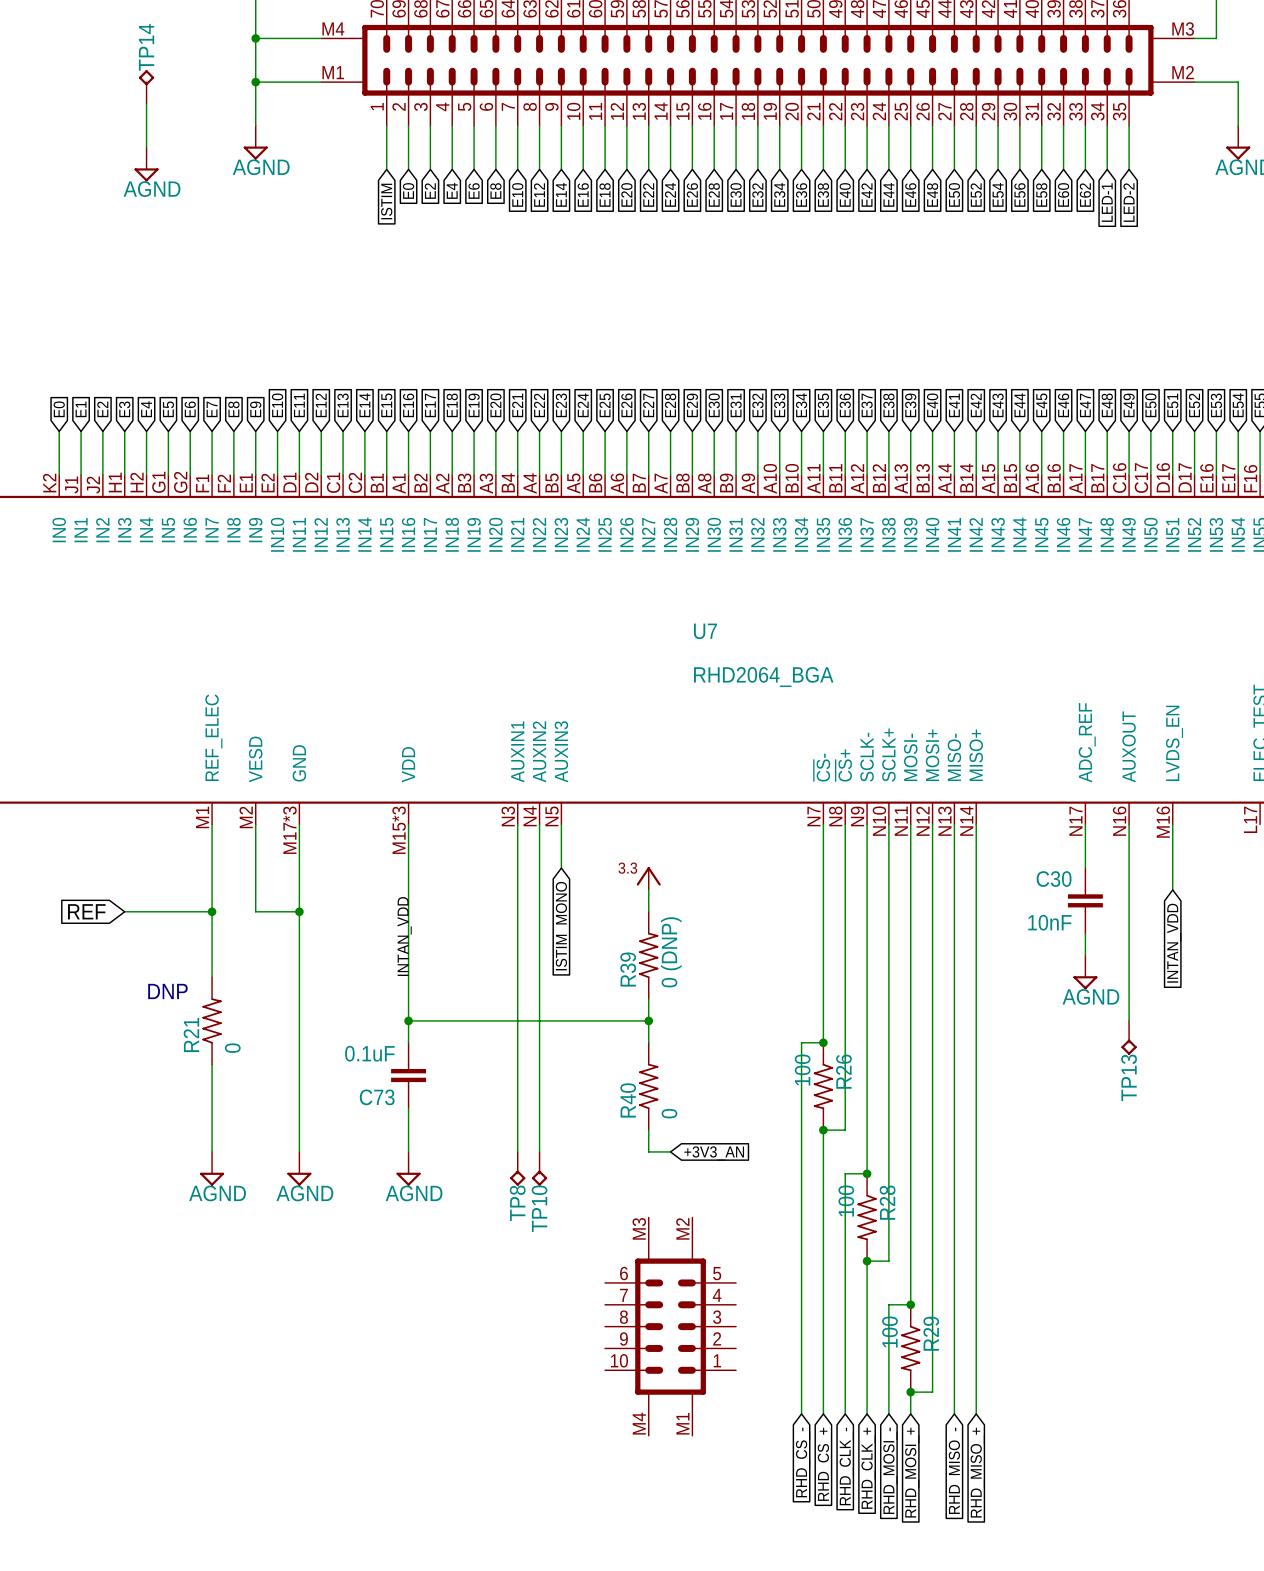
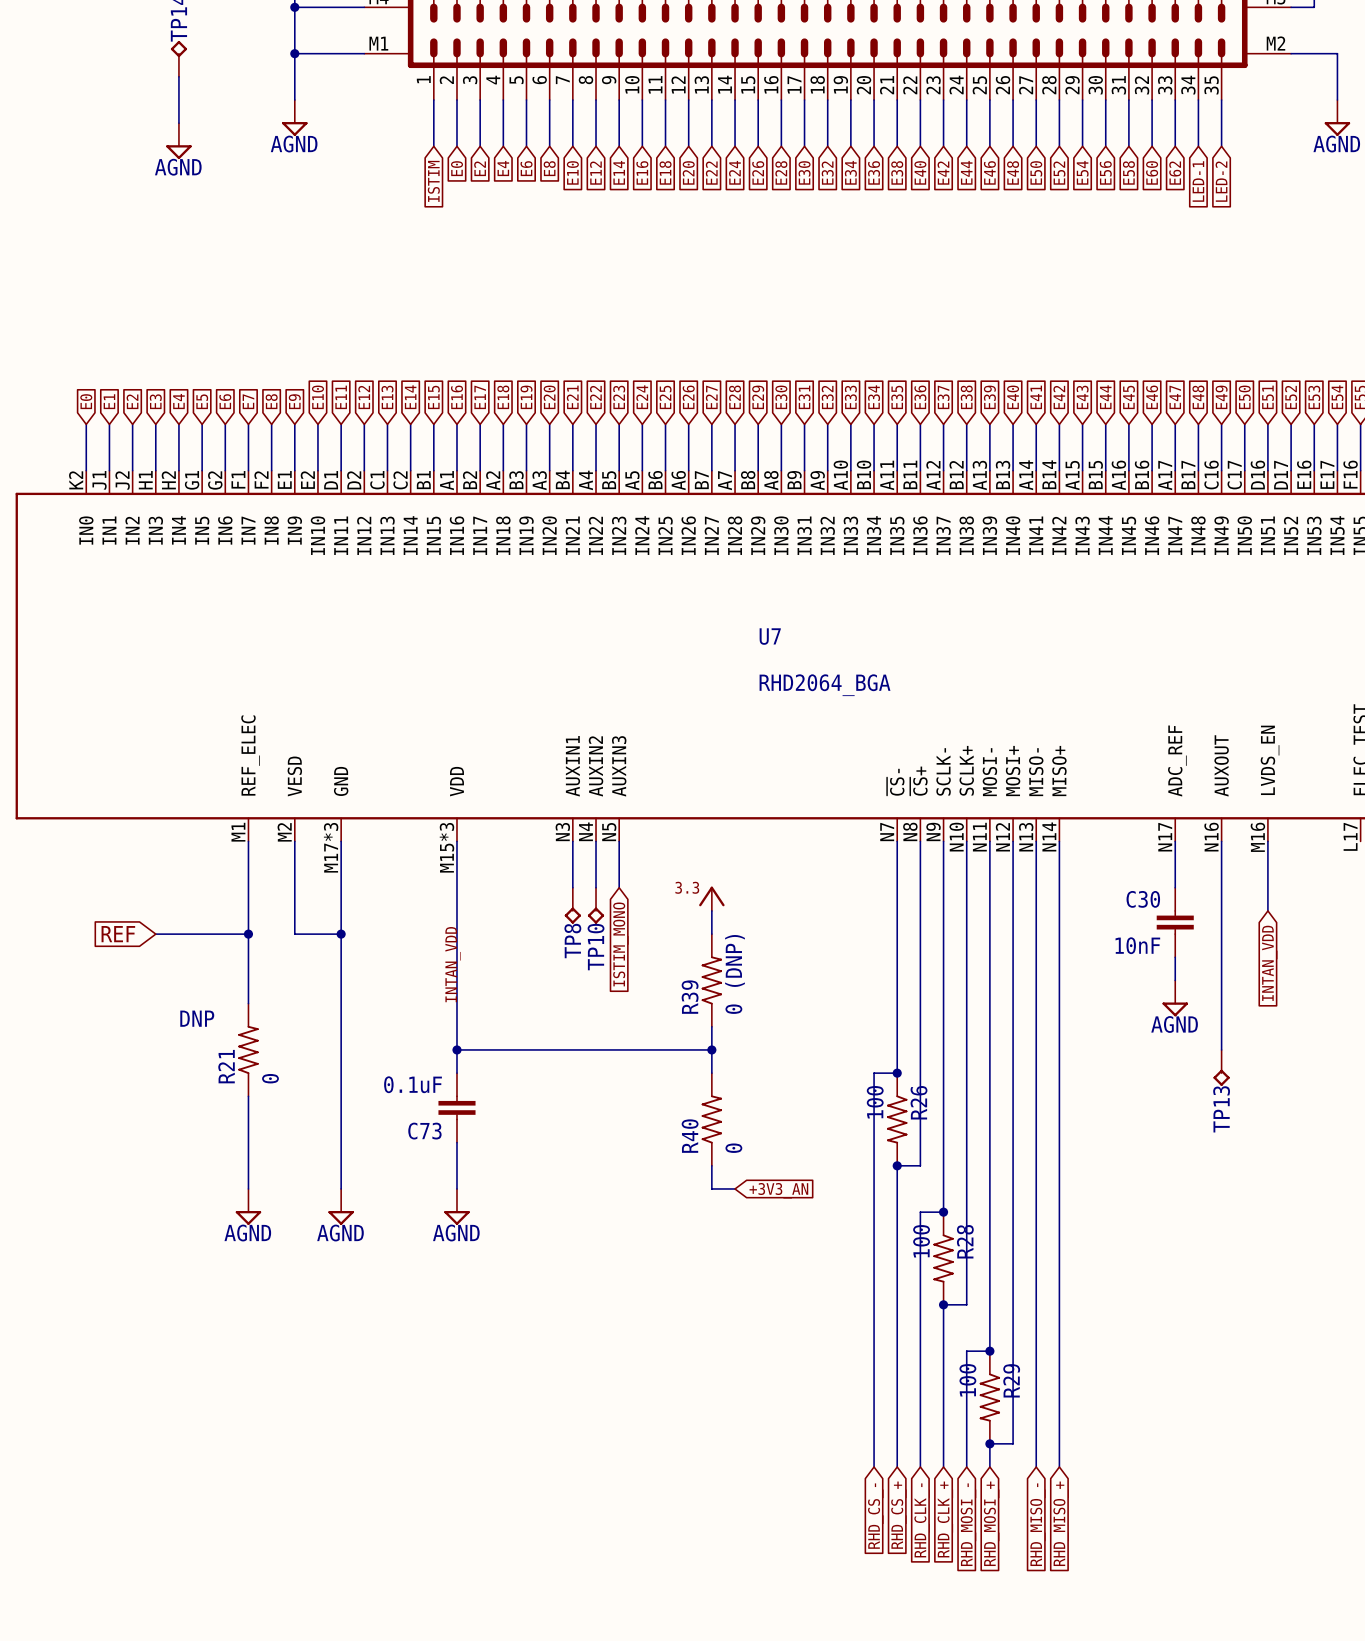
wire: (517, 868) (517, 1151) -> none
wire: (539, 868) (539, 1151) -> none
TP8 position: (517, 1168) -> (572, 905)
TP10 position: (539, 1168) -> (596, 905)
part: (670, 1326) -> none

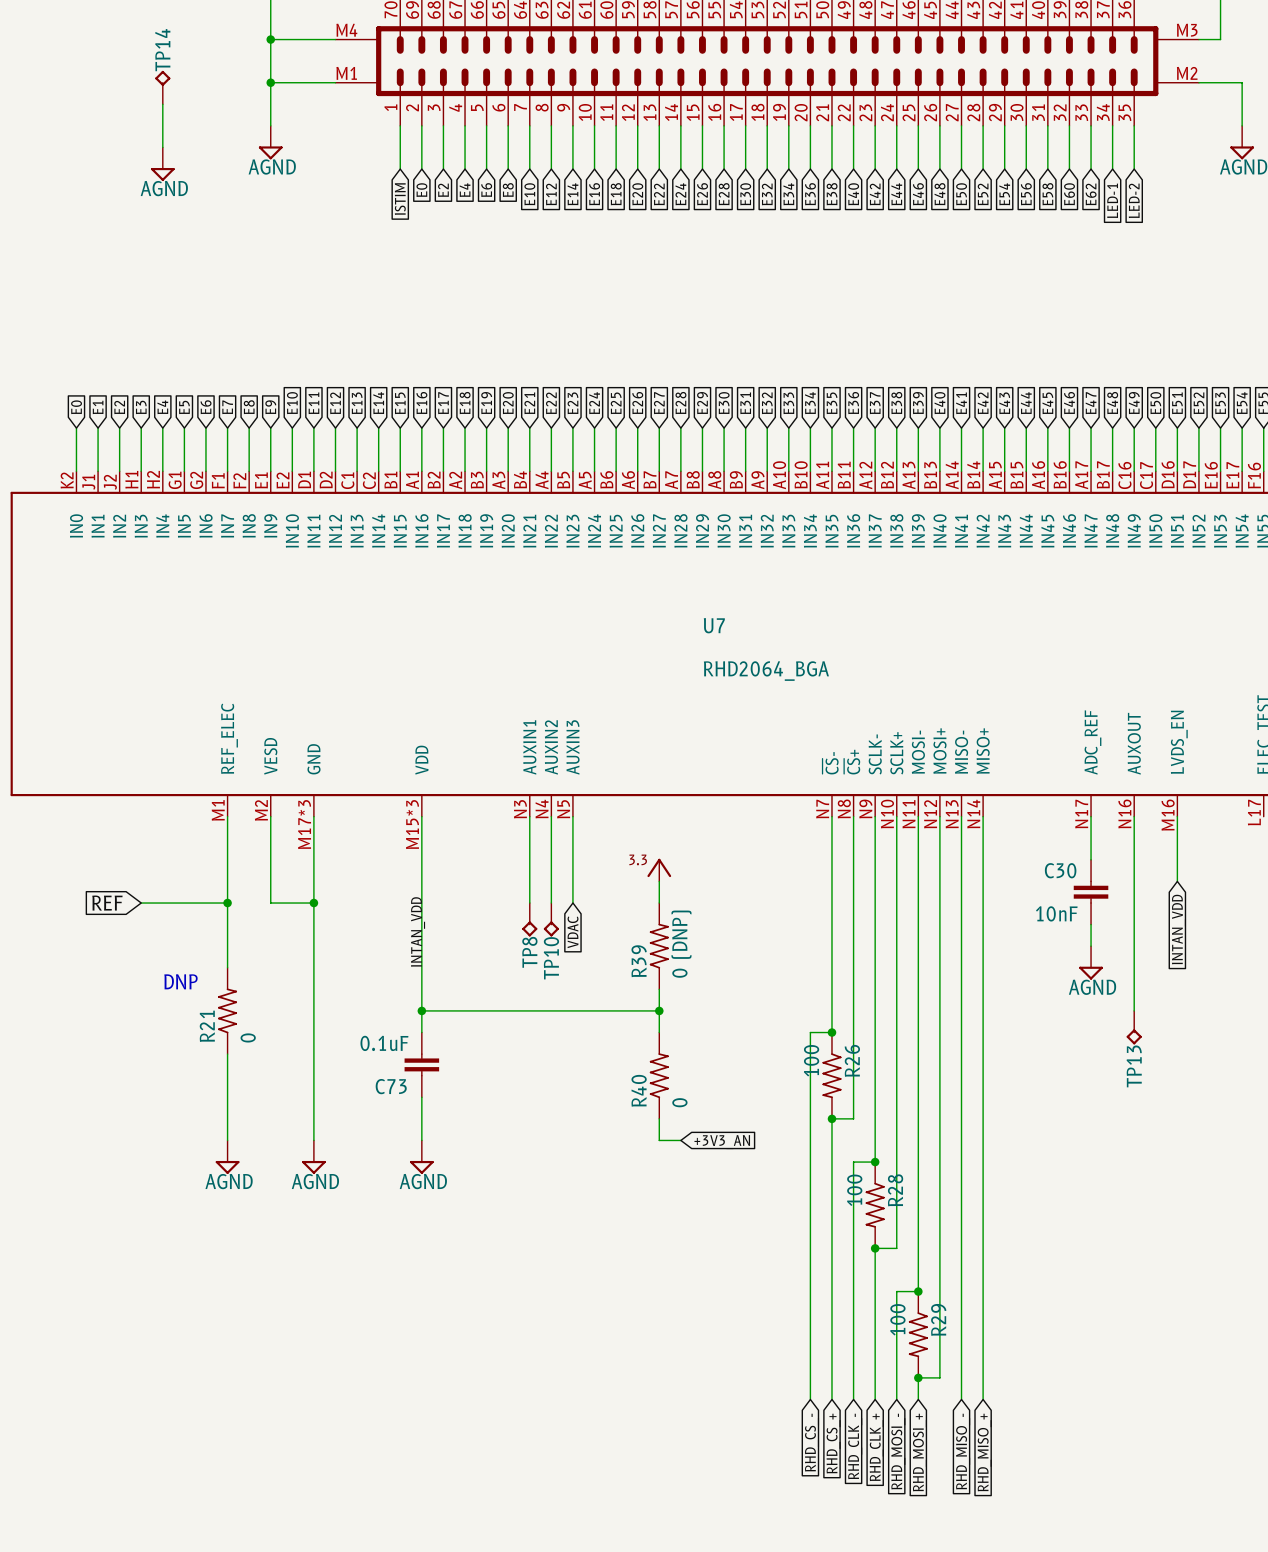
wire: none -> (572, 859) (572, 903)
TP8 position: (572, 905) -> (529, 919)
TP10 position: (596, 905) -> (551, 919)
global label: ISTIM_MONO (620, 944) -> none
global label: none -> VDAC (573, 932)

